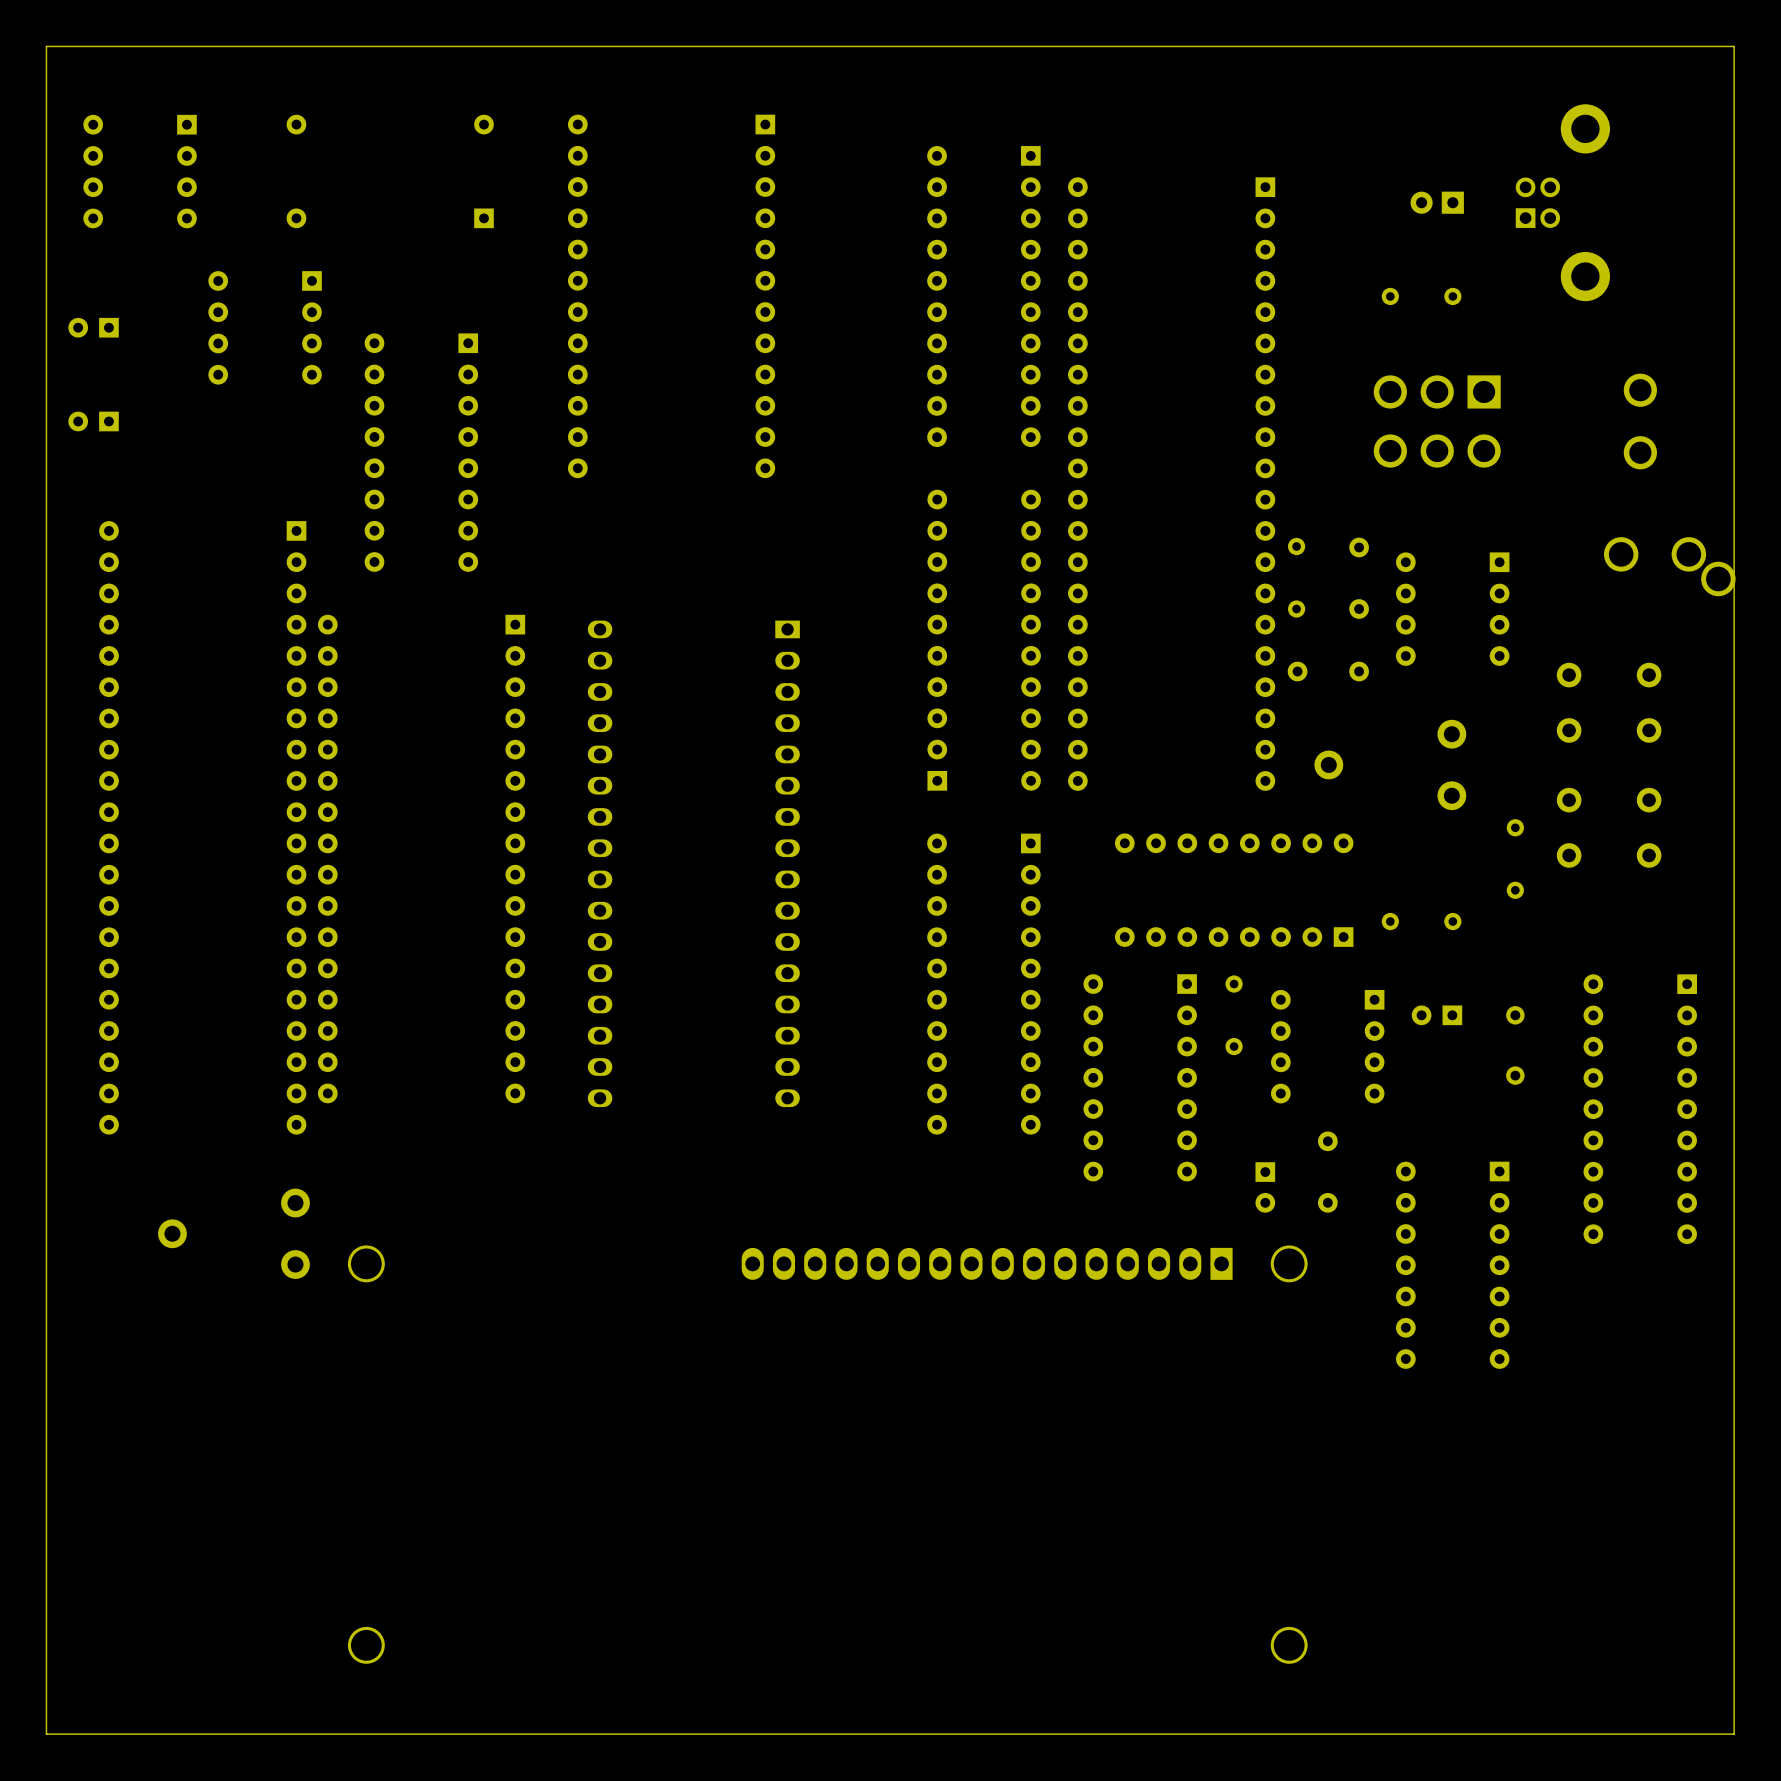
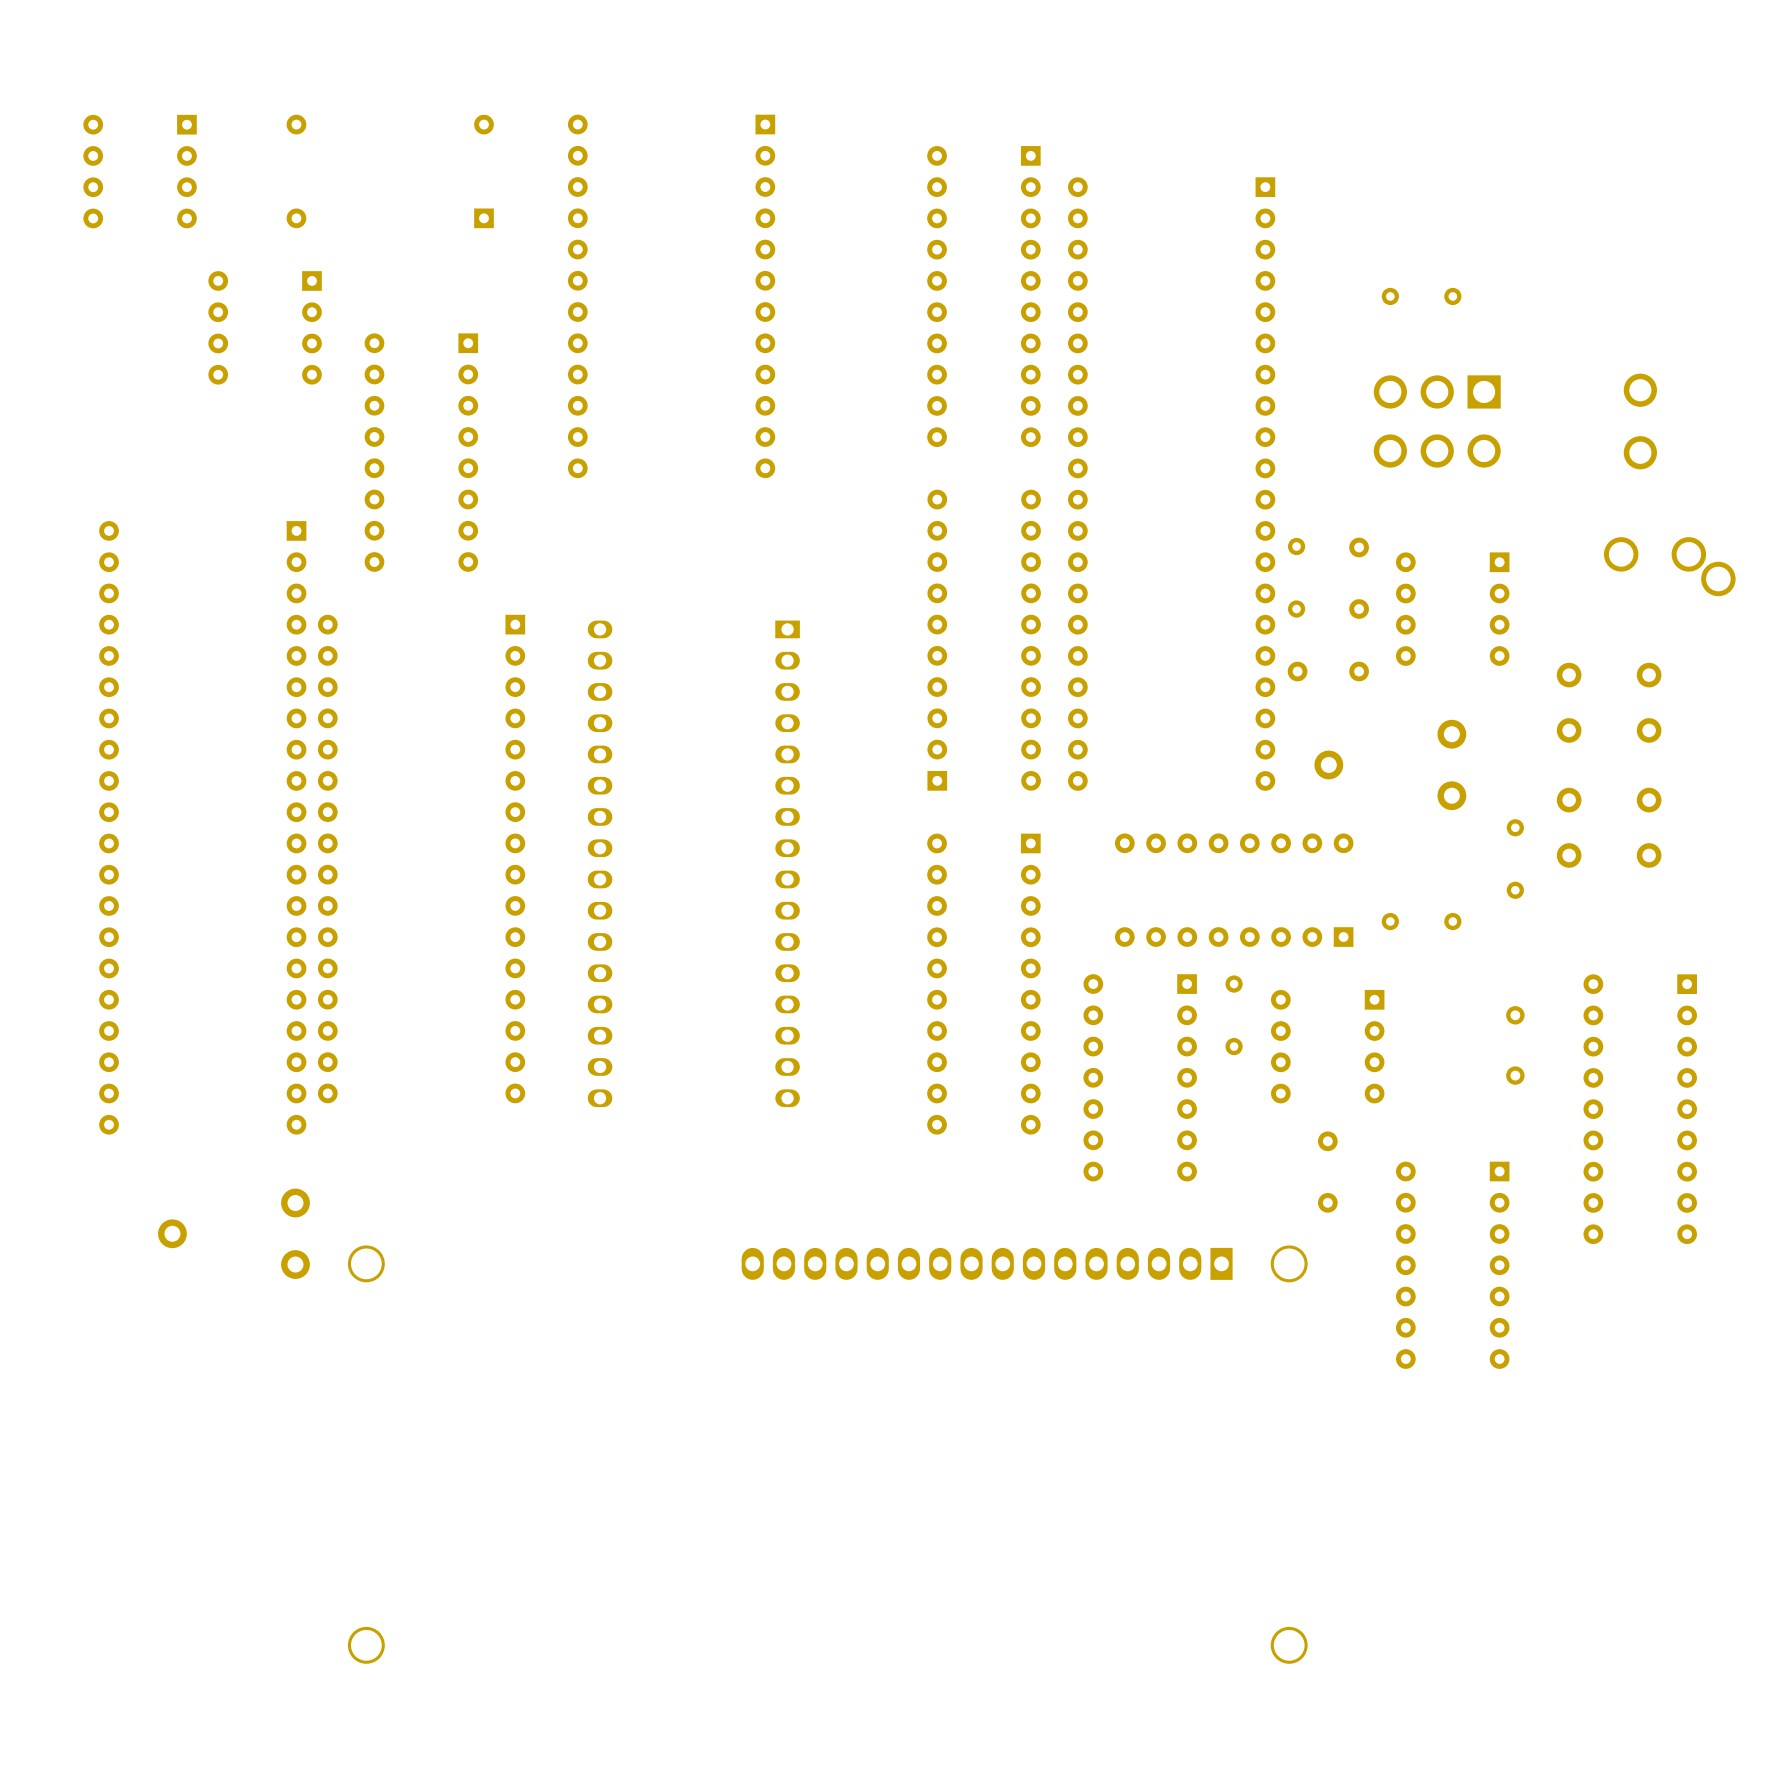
board edge: (1734, 46) (46, 46) (46, 1734) (1734, 1734) (1734, 46) -> none
part: (1437, 202) -> none
part: (1562, 202) -> none
part: (93, 327) -> none
part: (93, 421) -> none
part: (1436, 1015) -> none
part: (1265, 1187) -> none

